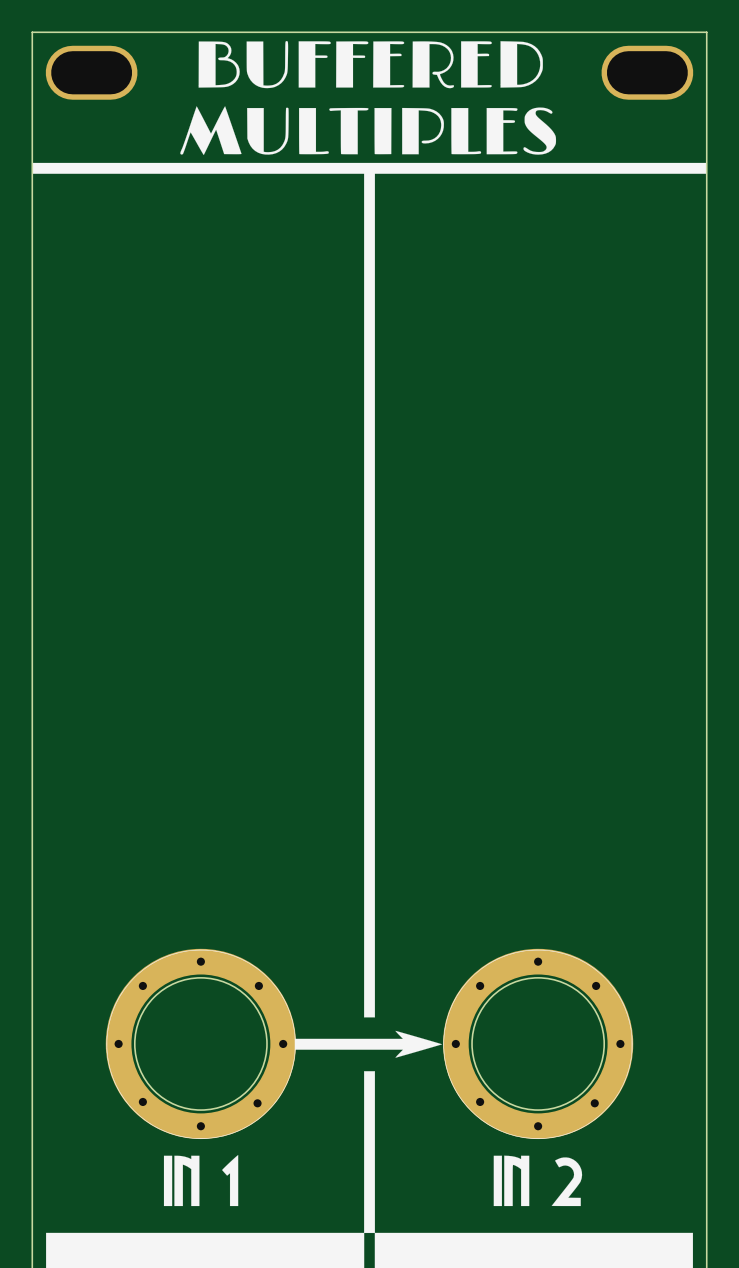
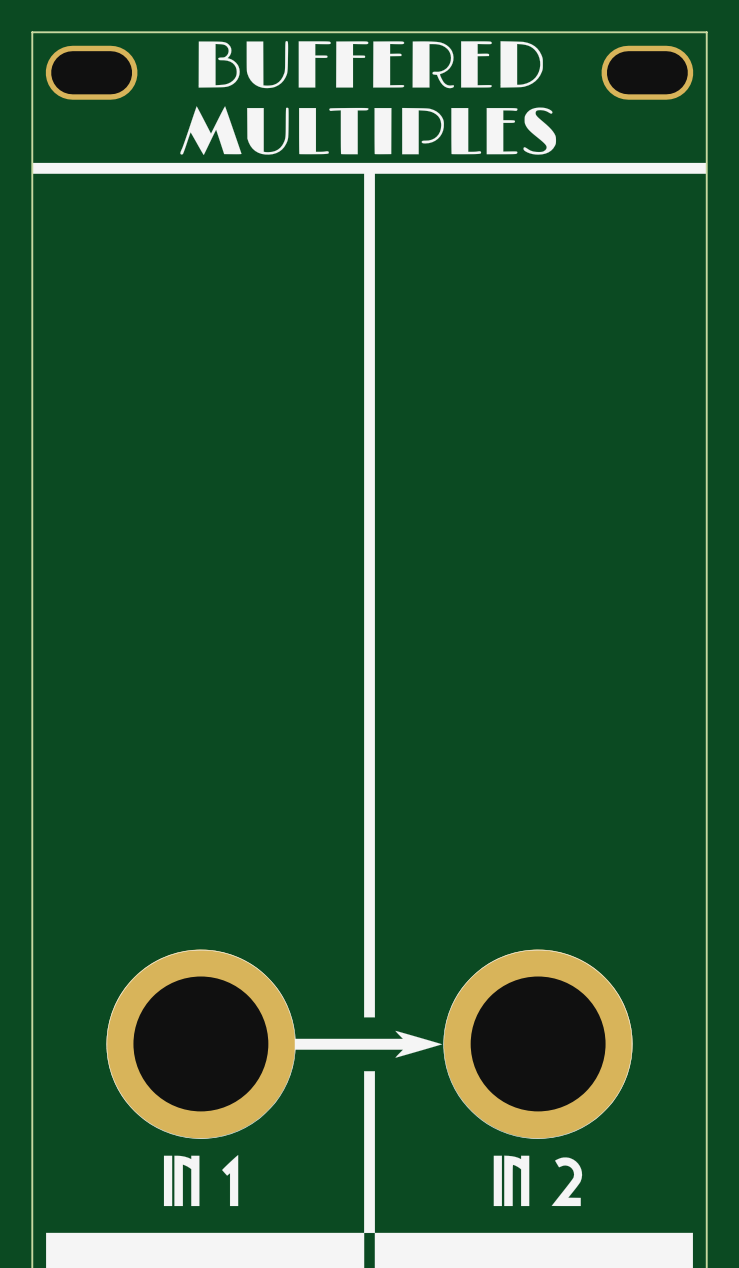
part footprint: [105, 948, 296, 1140] -> [106, 949, 296, 1139]
part footprint: [443, 948, 634, 1140] -> [443, 949, 633, 1139]

